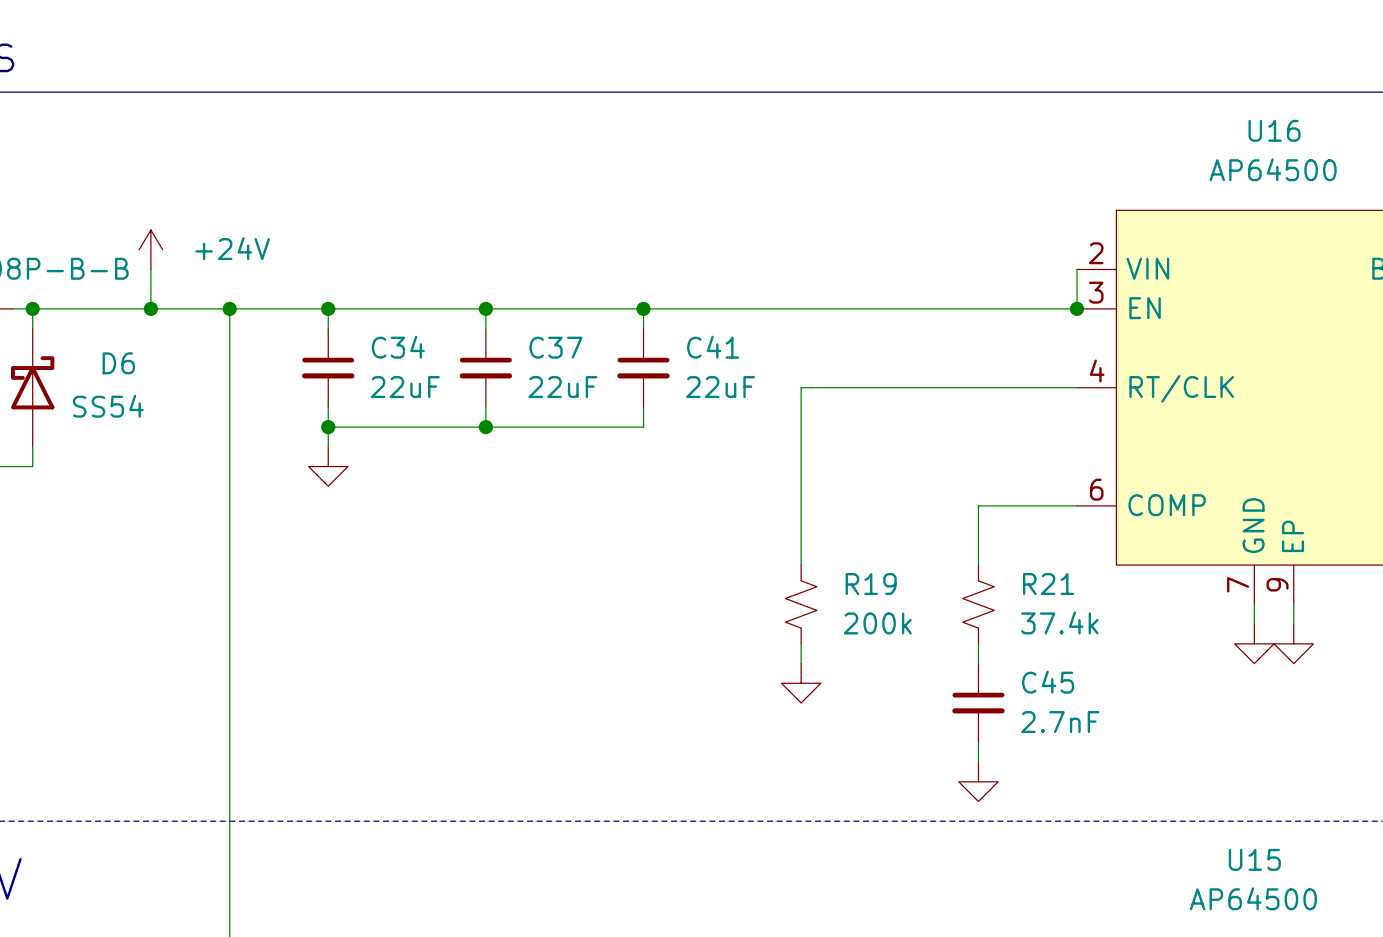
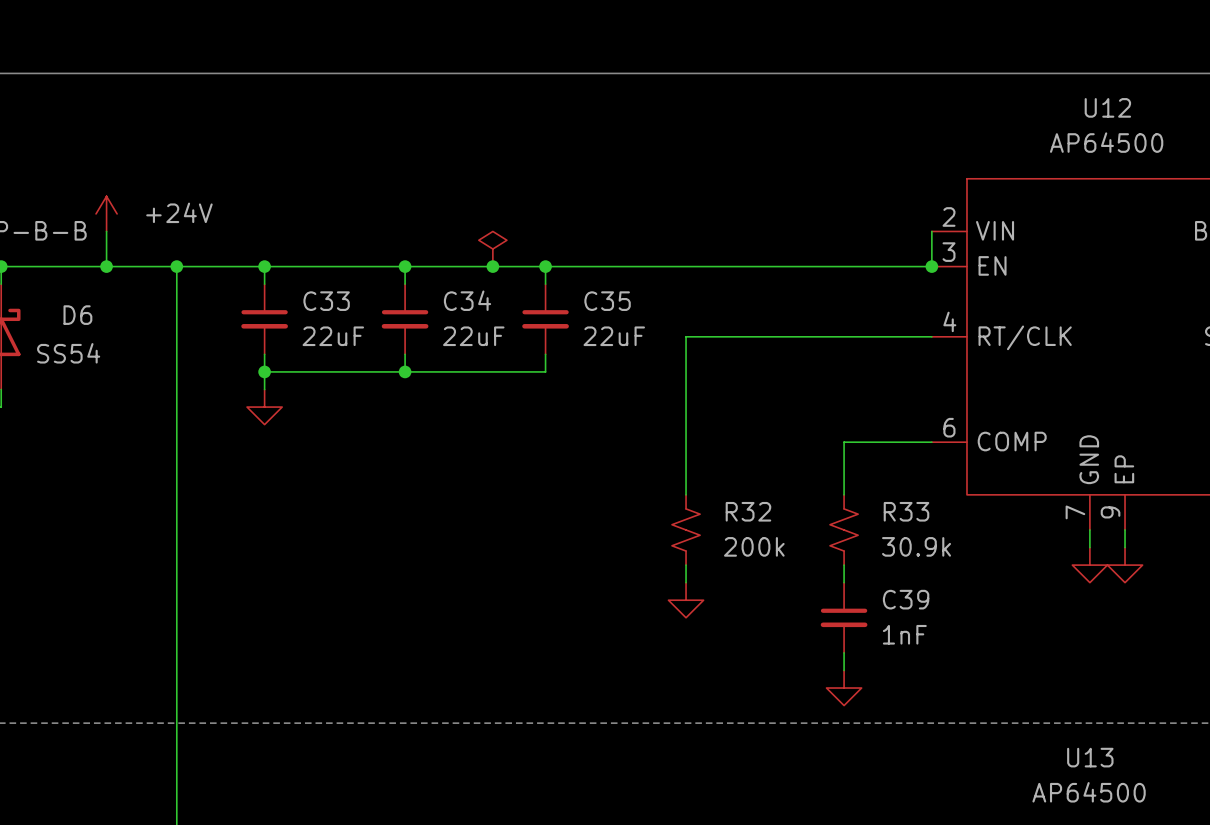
U16 name: U16 (1274, 130) -> U12 (1107, 107)
power symbol: none -> (492, 249)
junction: none -> (492, 266)
C34 name: C34 (398, 347) -> C33 (326, 301)
C37 name: C37 (555, 347) -> C34 (467, 300)
C41 name: C41 (713, 347) -> C35 (607, 301)
R19 name: R19 (871, 584) -> R32 (748, 511)
R21 name: R21 (1048, 584) -> R33 (906, 511)
R21 value: 37.4k (1059, 622) -> 30.9k (916, 546)
C45 name: C45 (1048, 682) -> C39 (906, 599)
C45 value: 2.7nF (1060, 722) -> 1nF (904, 634)
U15 name: U15 (1254, 859) -> U13 (1090, 757)

